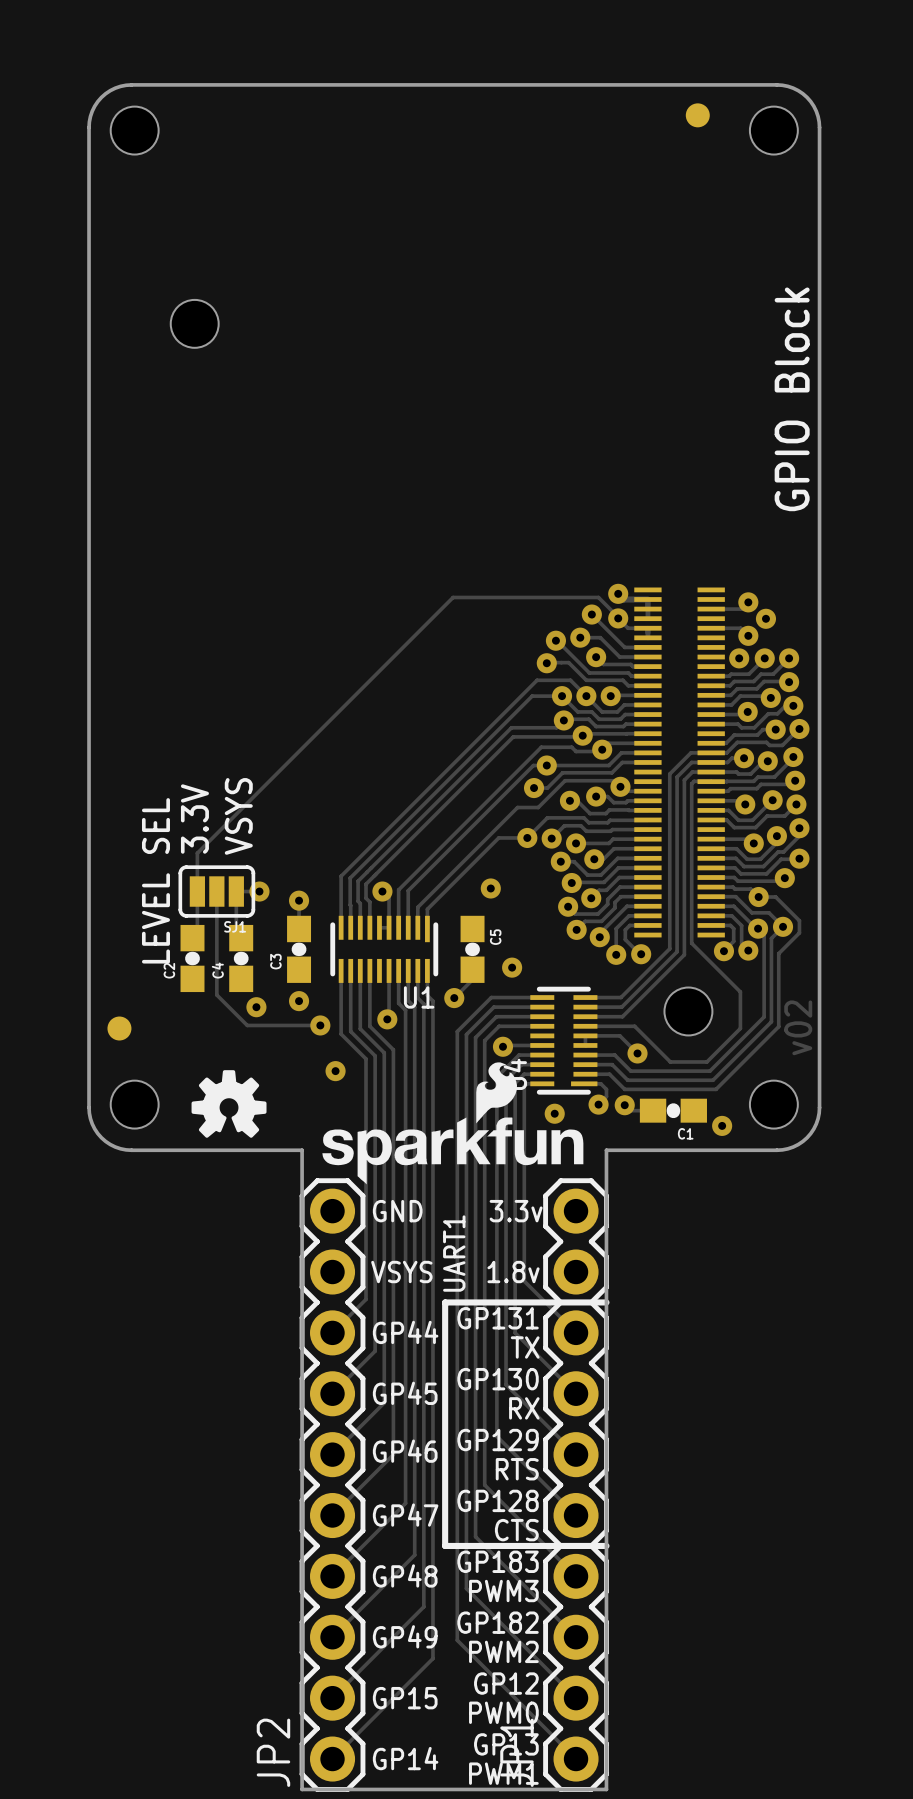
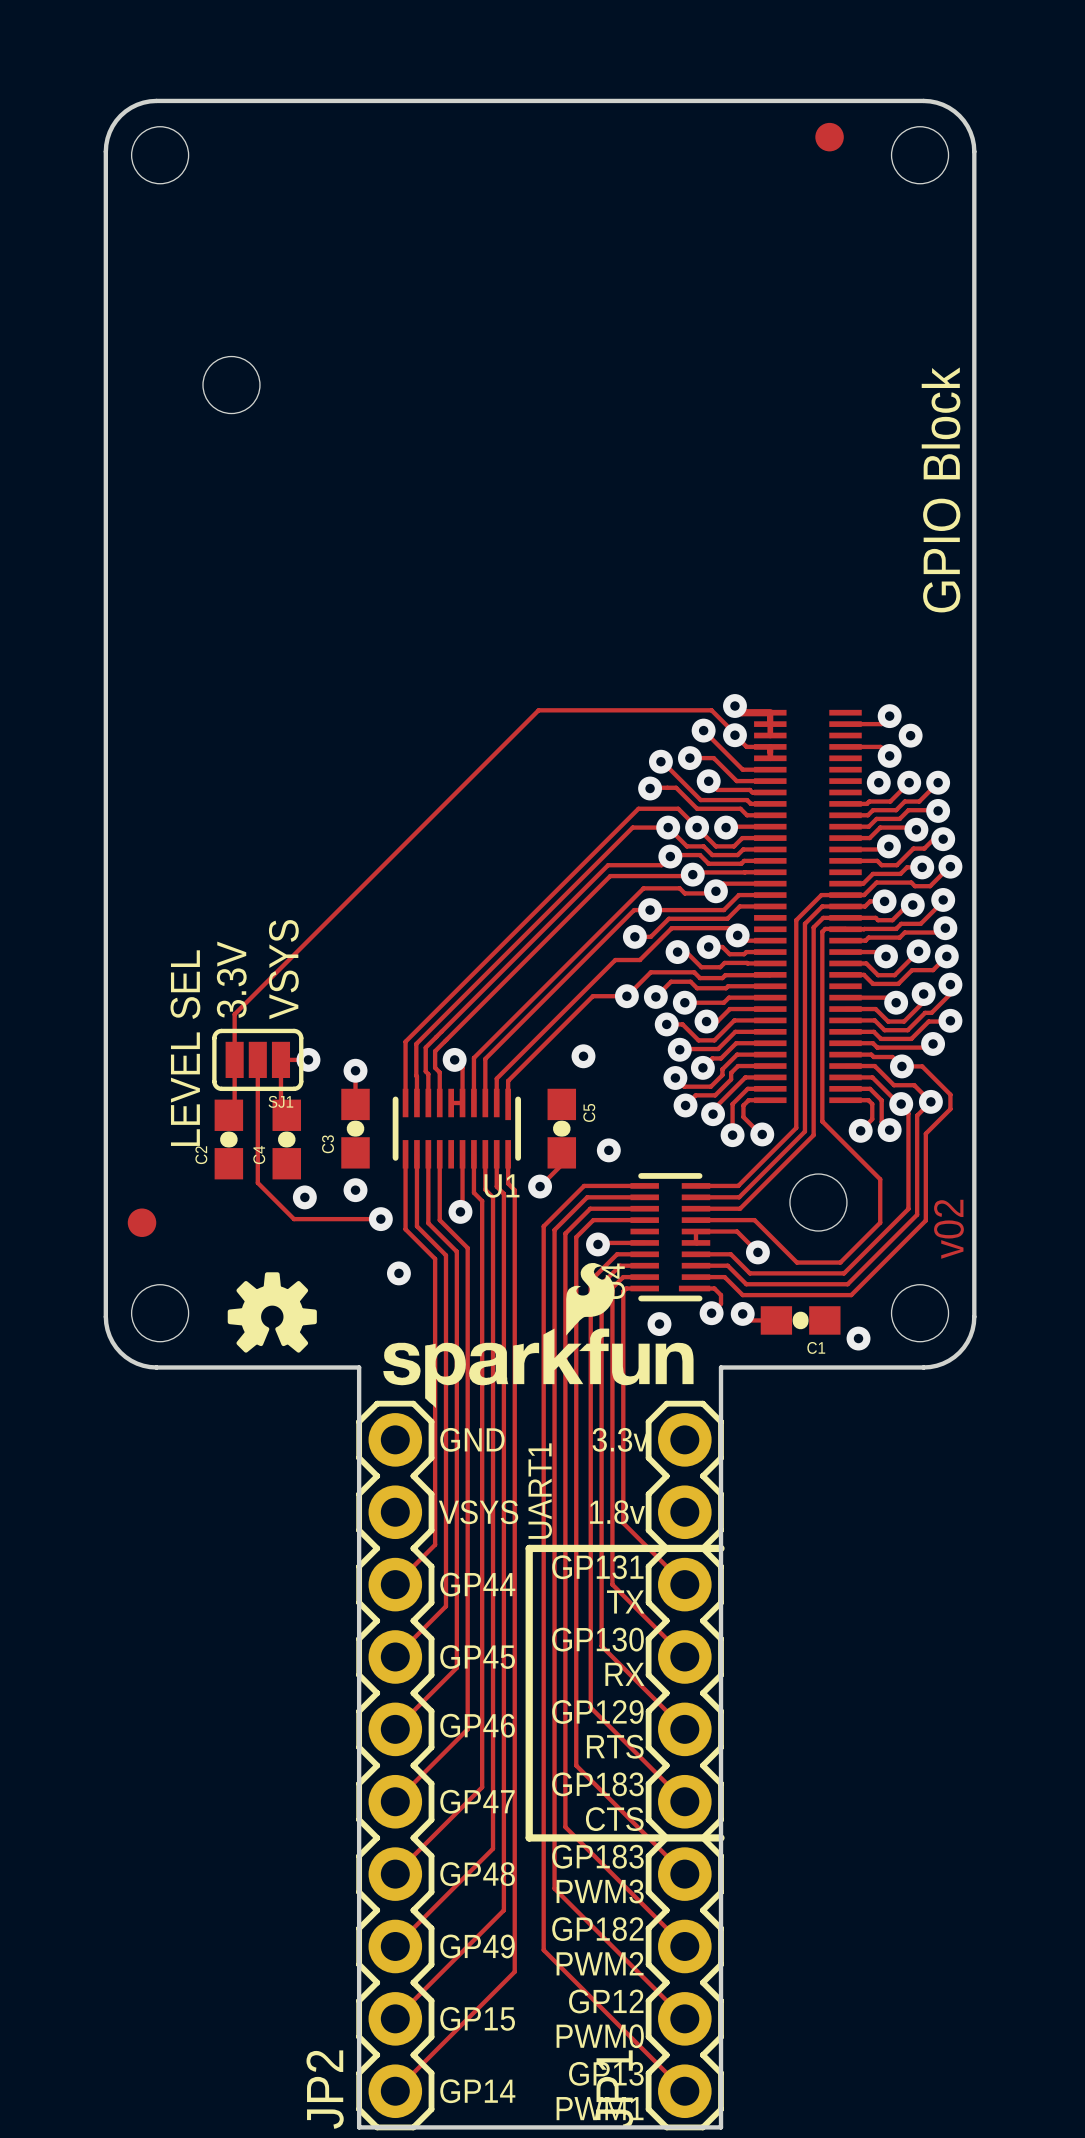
part footprint: [634, 587, 725, 938] -> [754, 709, 862, 1104]
text: GP128 (498, 1500) -> GP183 (597, 1784)

